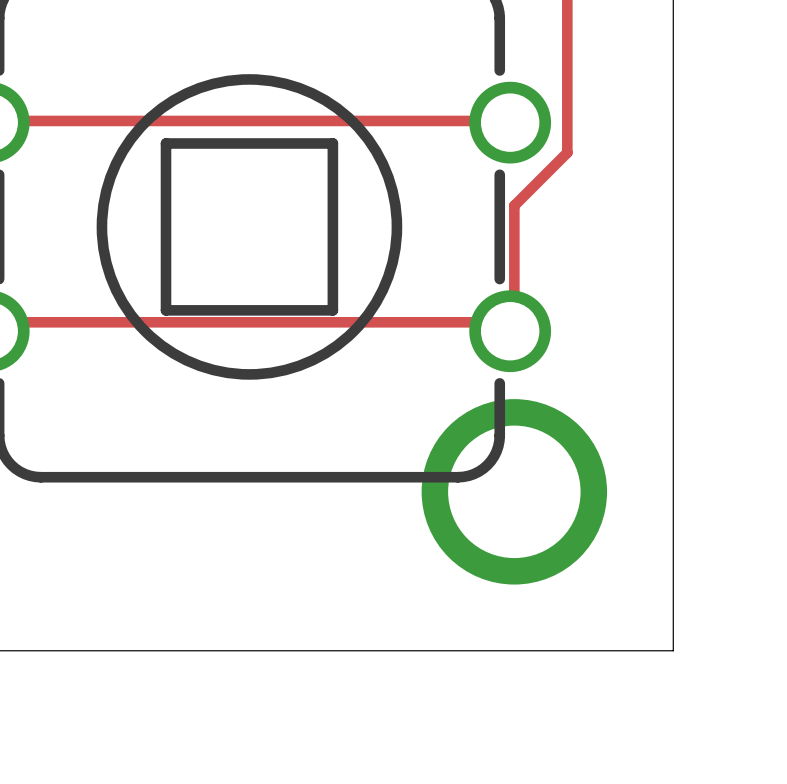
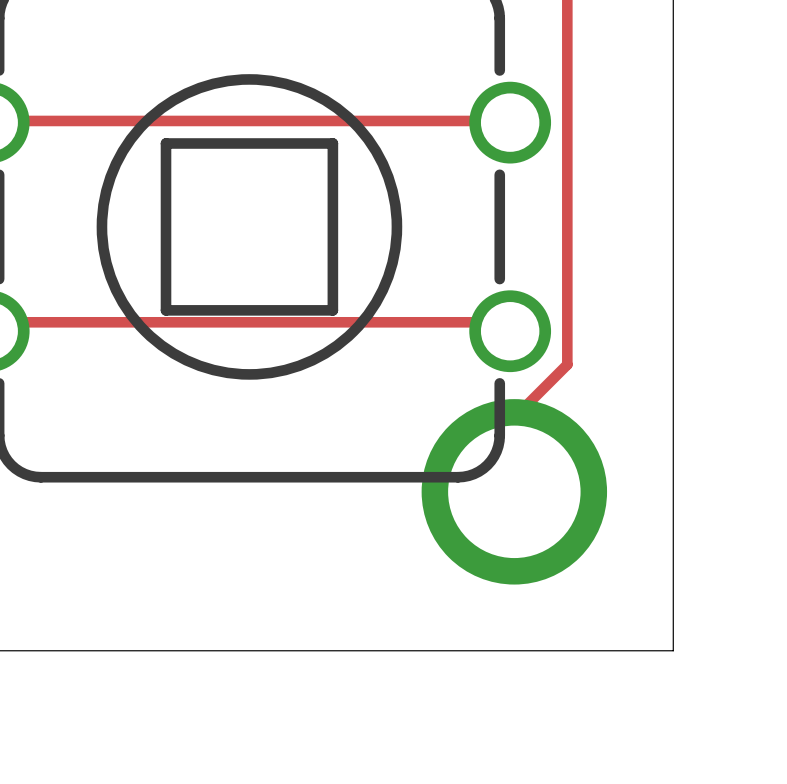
track: (567, 152) (514, 205) (514, 322) (510, 331) -> (567, 152) (567, 364) (514, 417) (514, 491)

